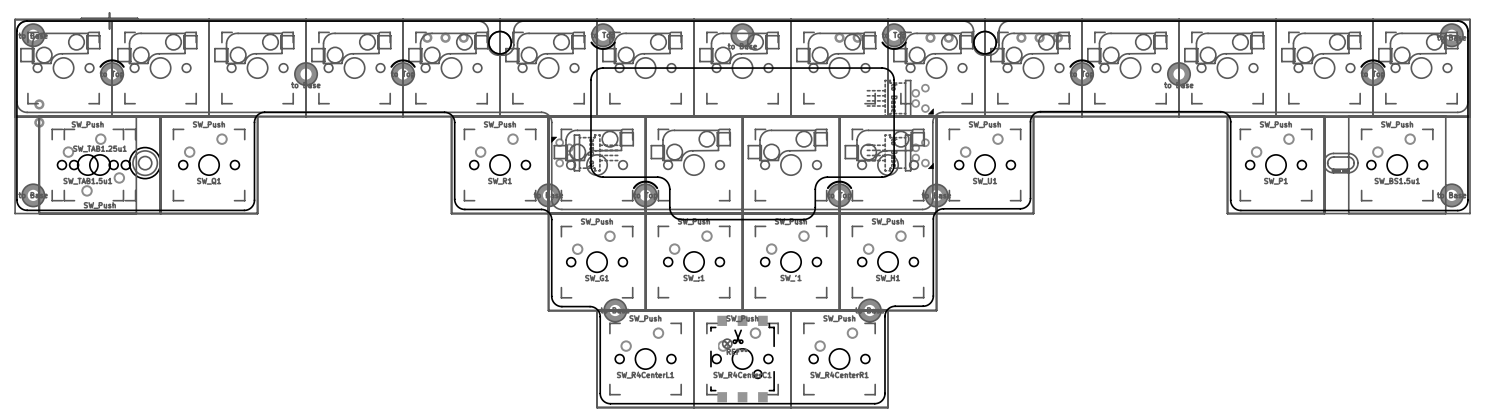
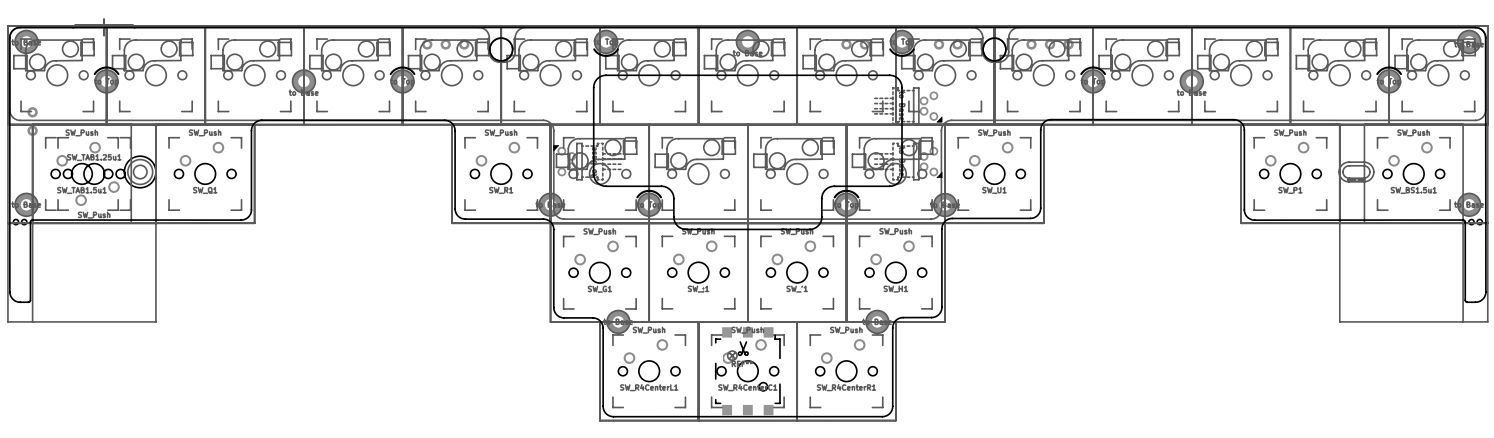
part footprint: [14, 12, 1471, 408] -> [7, 18, 1489, 421]

